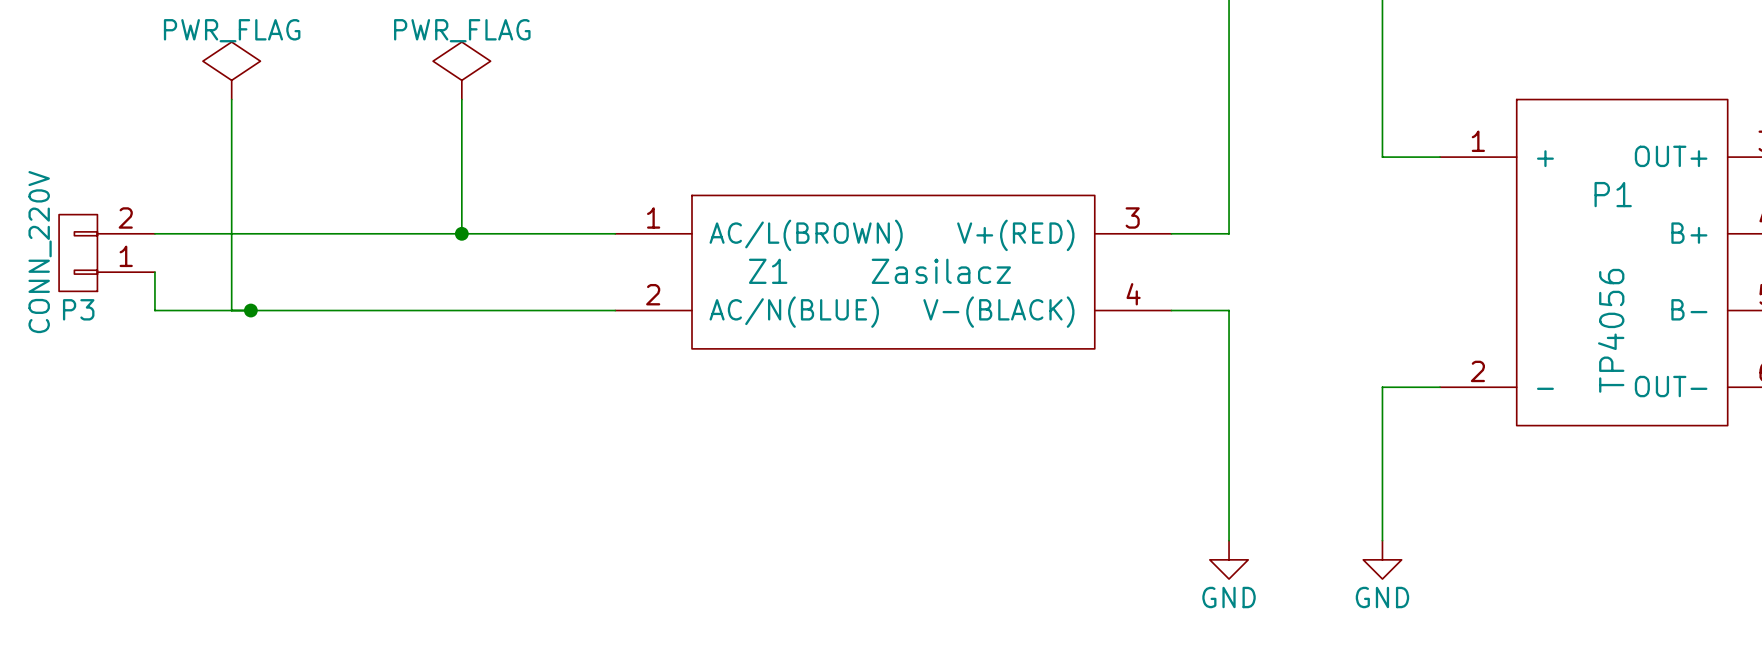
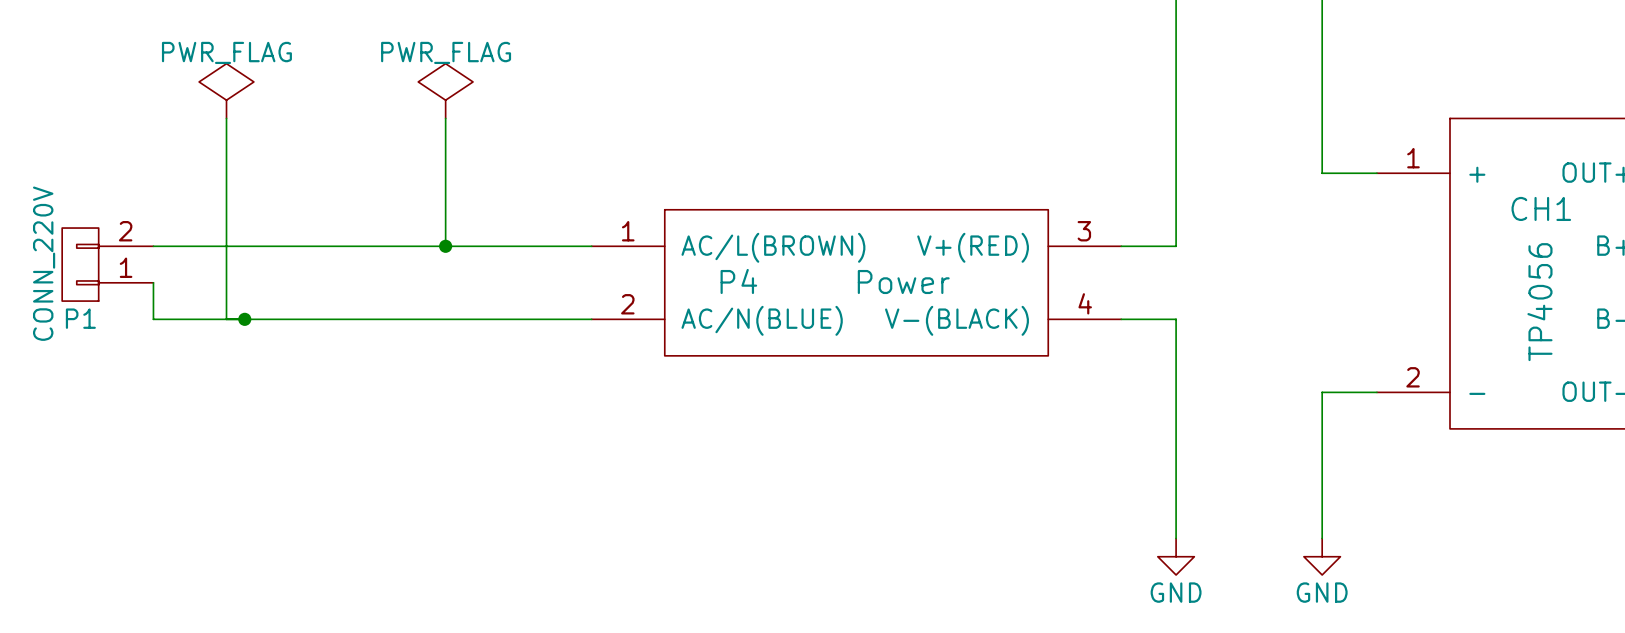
P1 name: P1 (1613, 194) -> CH1 (1541, 208)
Z1 name: Z1 (768, 271) -> P4 (738, 281)
Z1 value: Zasilacz (941, 271) -> Power (903, 281)
P3 name: P3 (78, 309) -> P1 (80, 318)
P1 value position: TP4056 (1611, 330) -> TP4056 (1539, 302)

